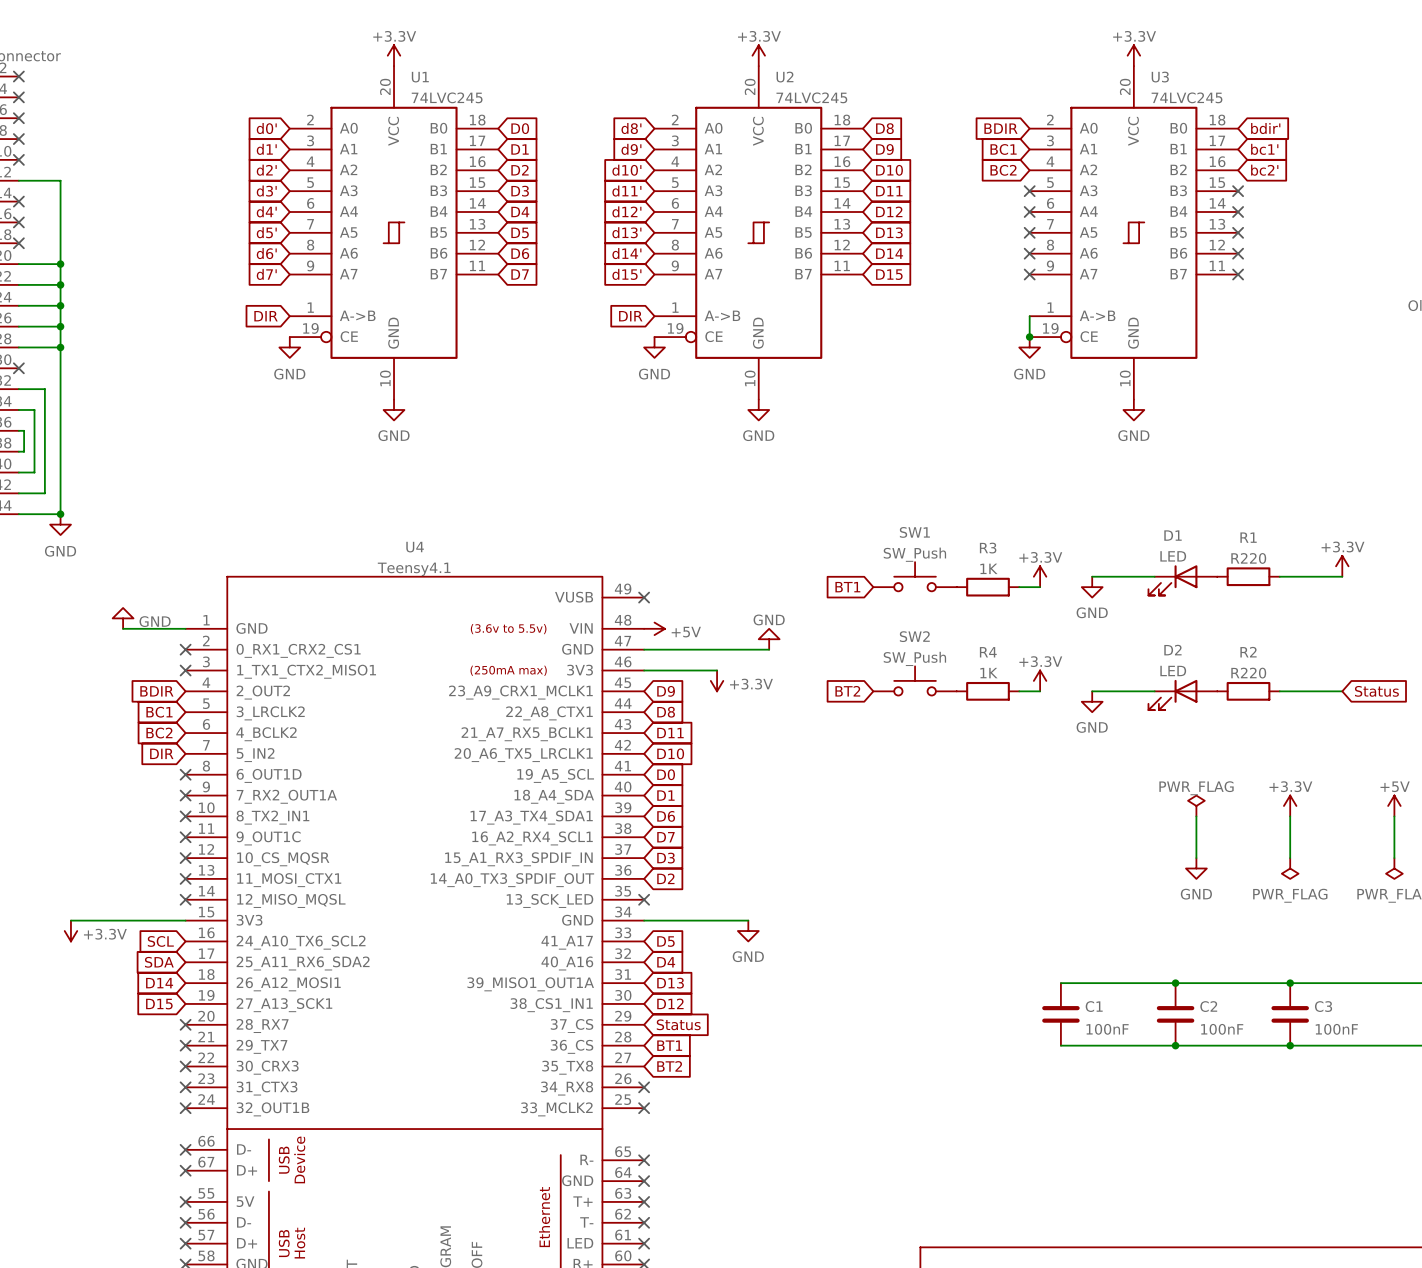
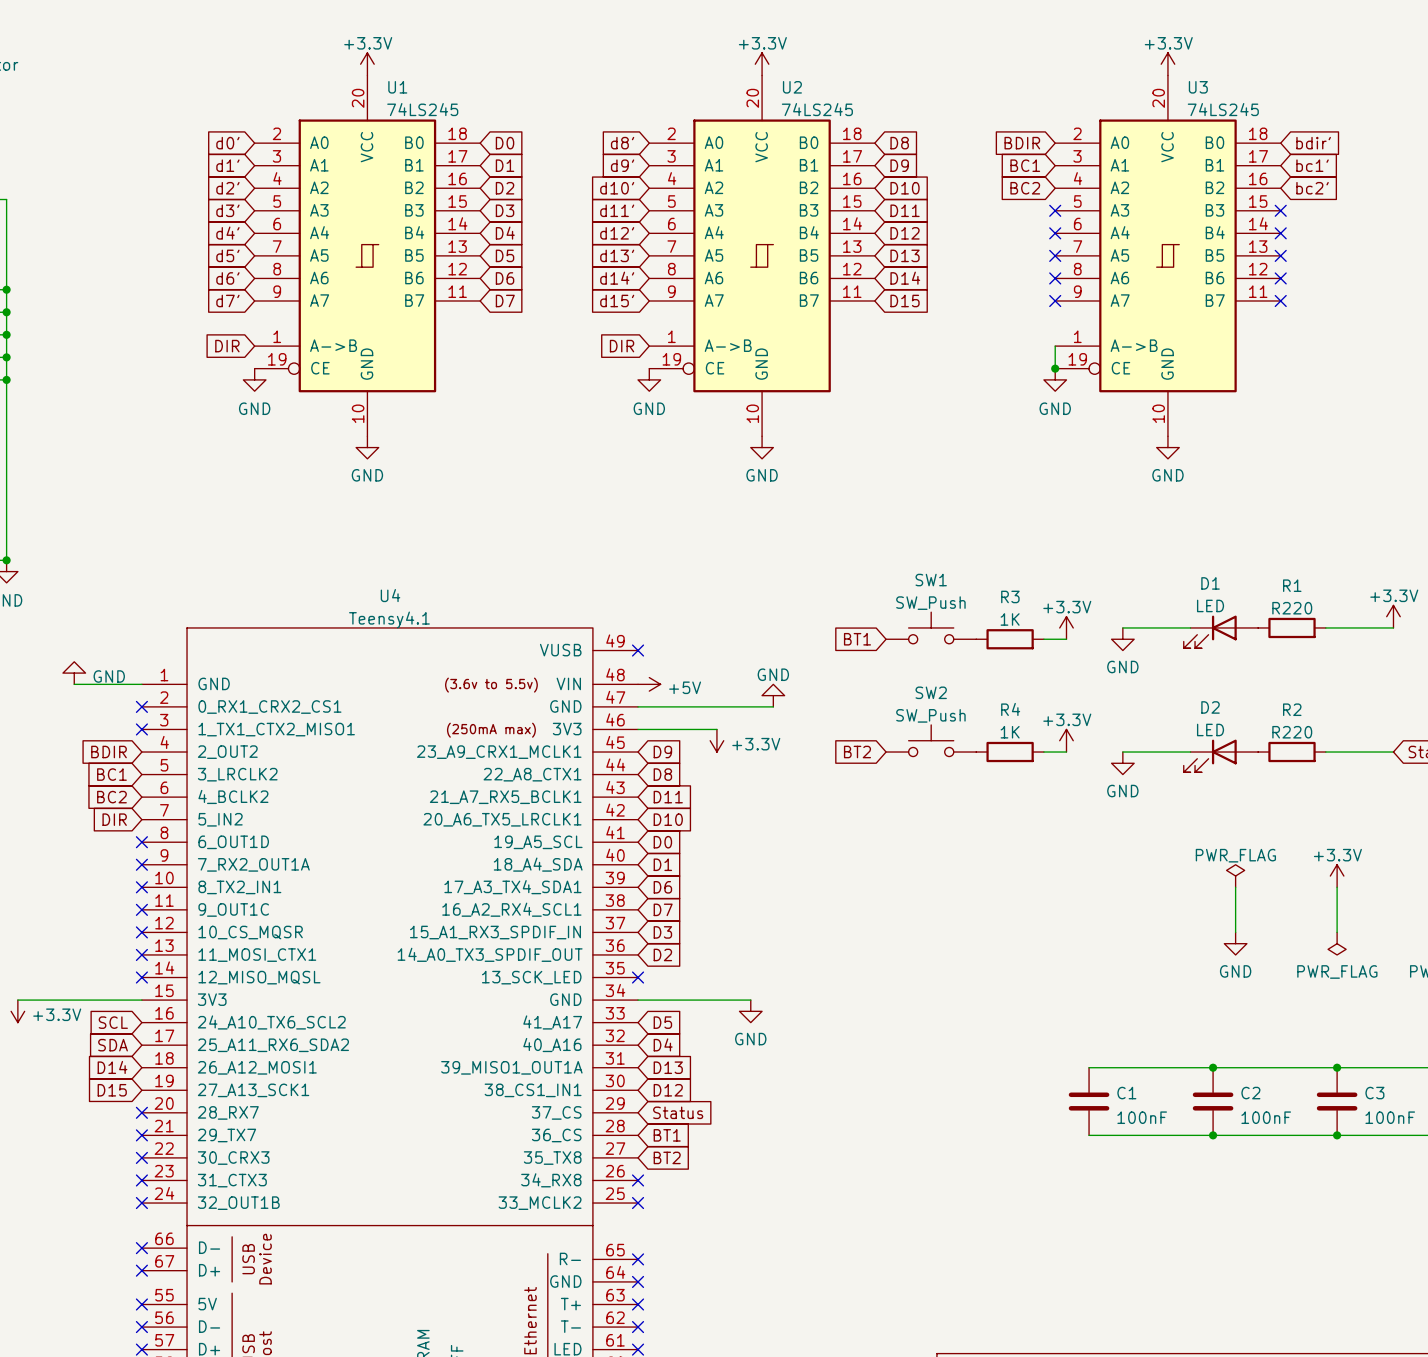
U1 value: 74LVC245 (447, 97) -> 74LS245 (422, 109)
U2 value: 74LVC245 (811, 97) -> 74LS245 (817, 109)
U3 value: 74LVC245 (1187, 97) -> 74LS245 (1223, 109)

